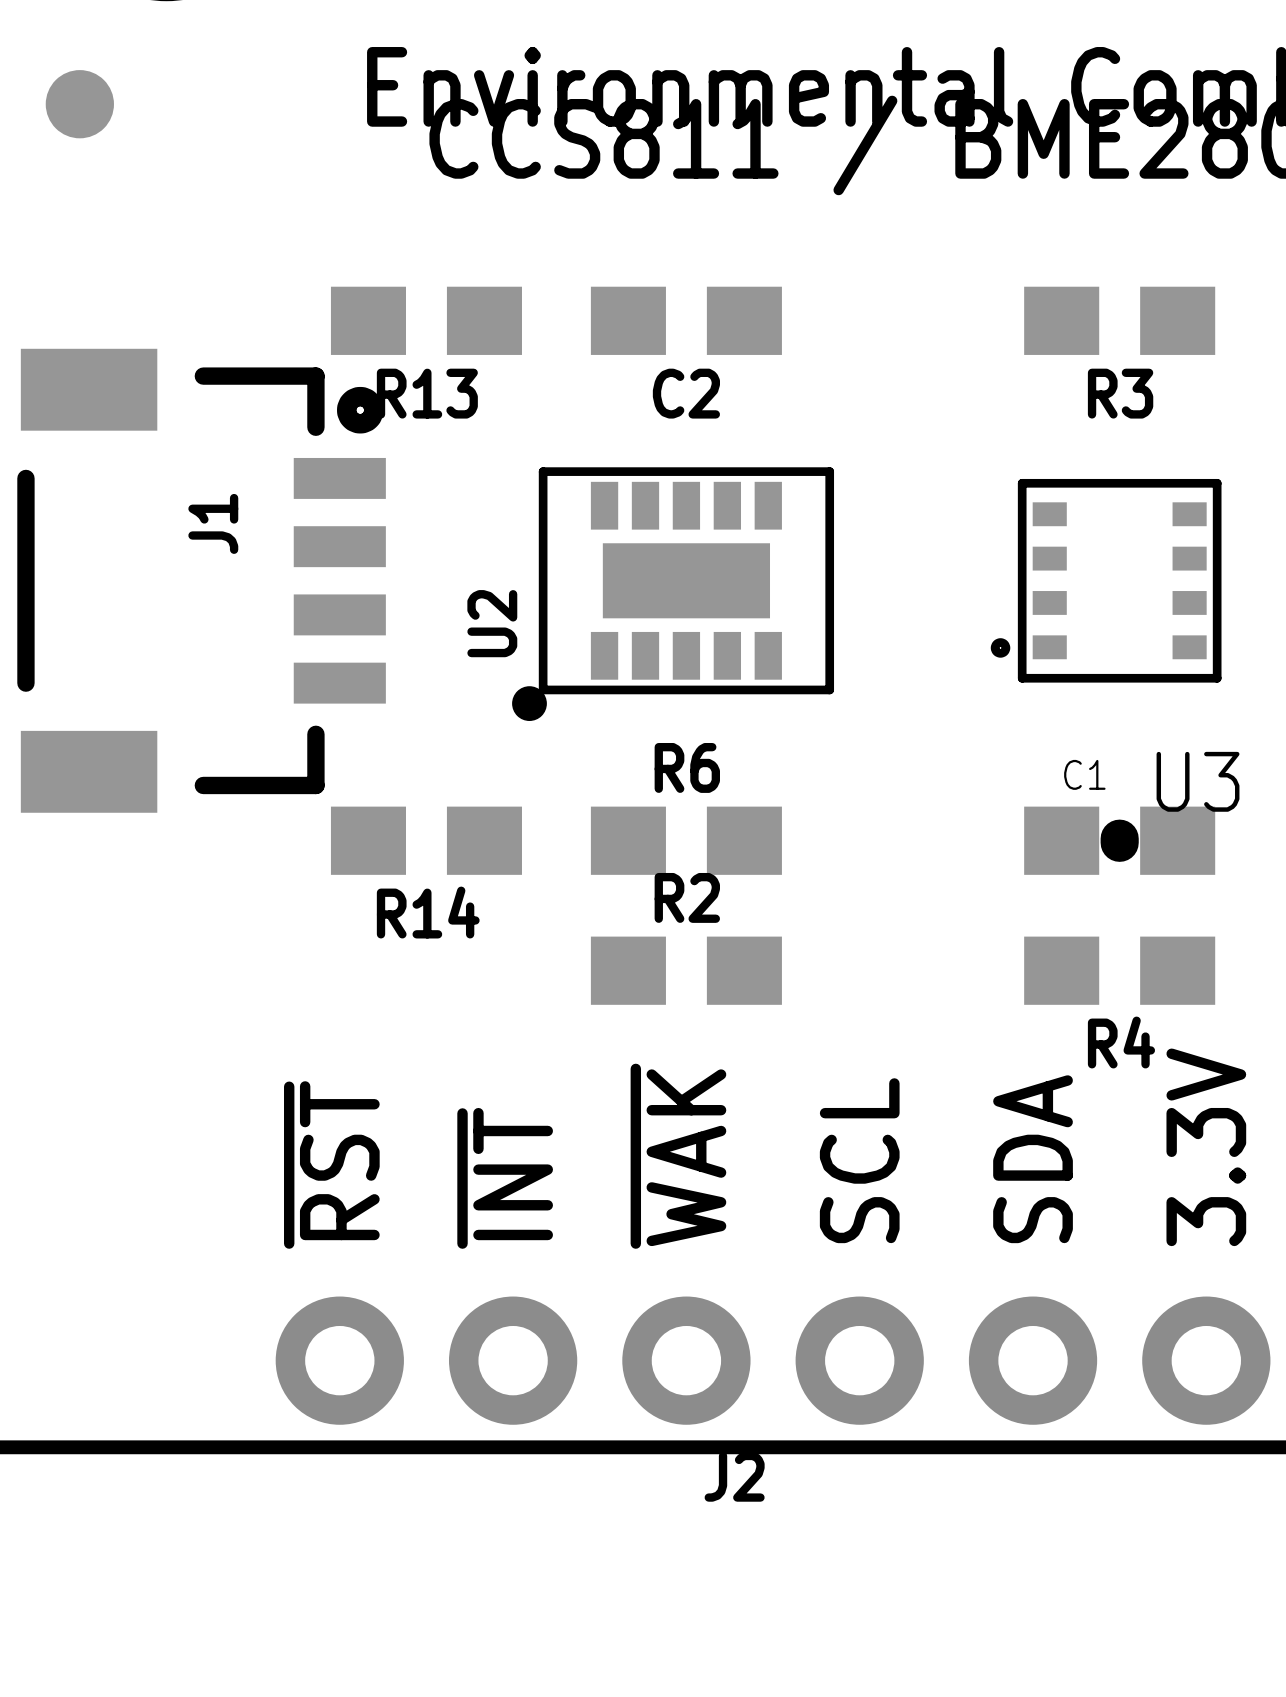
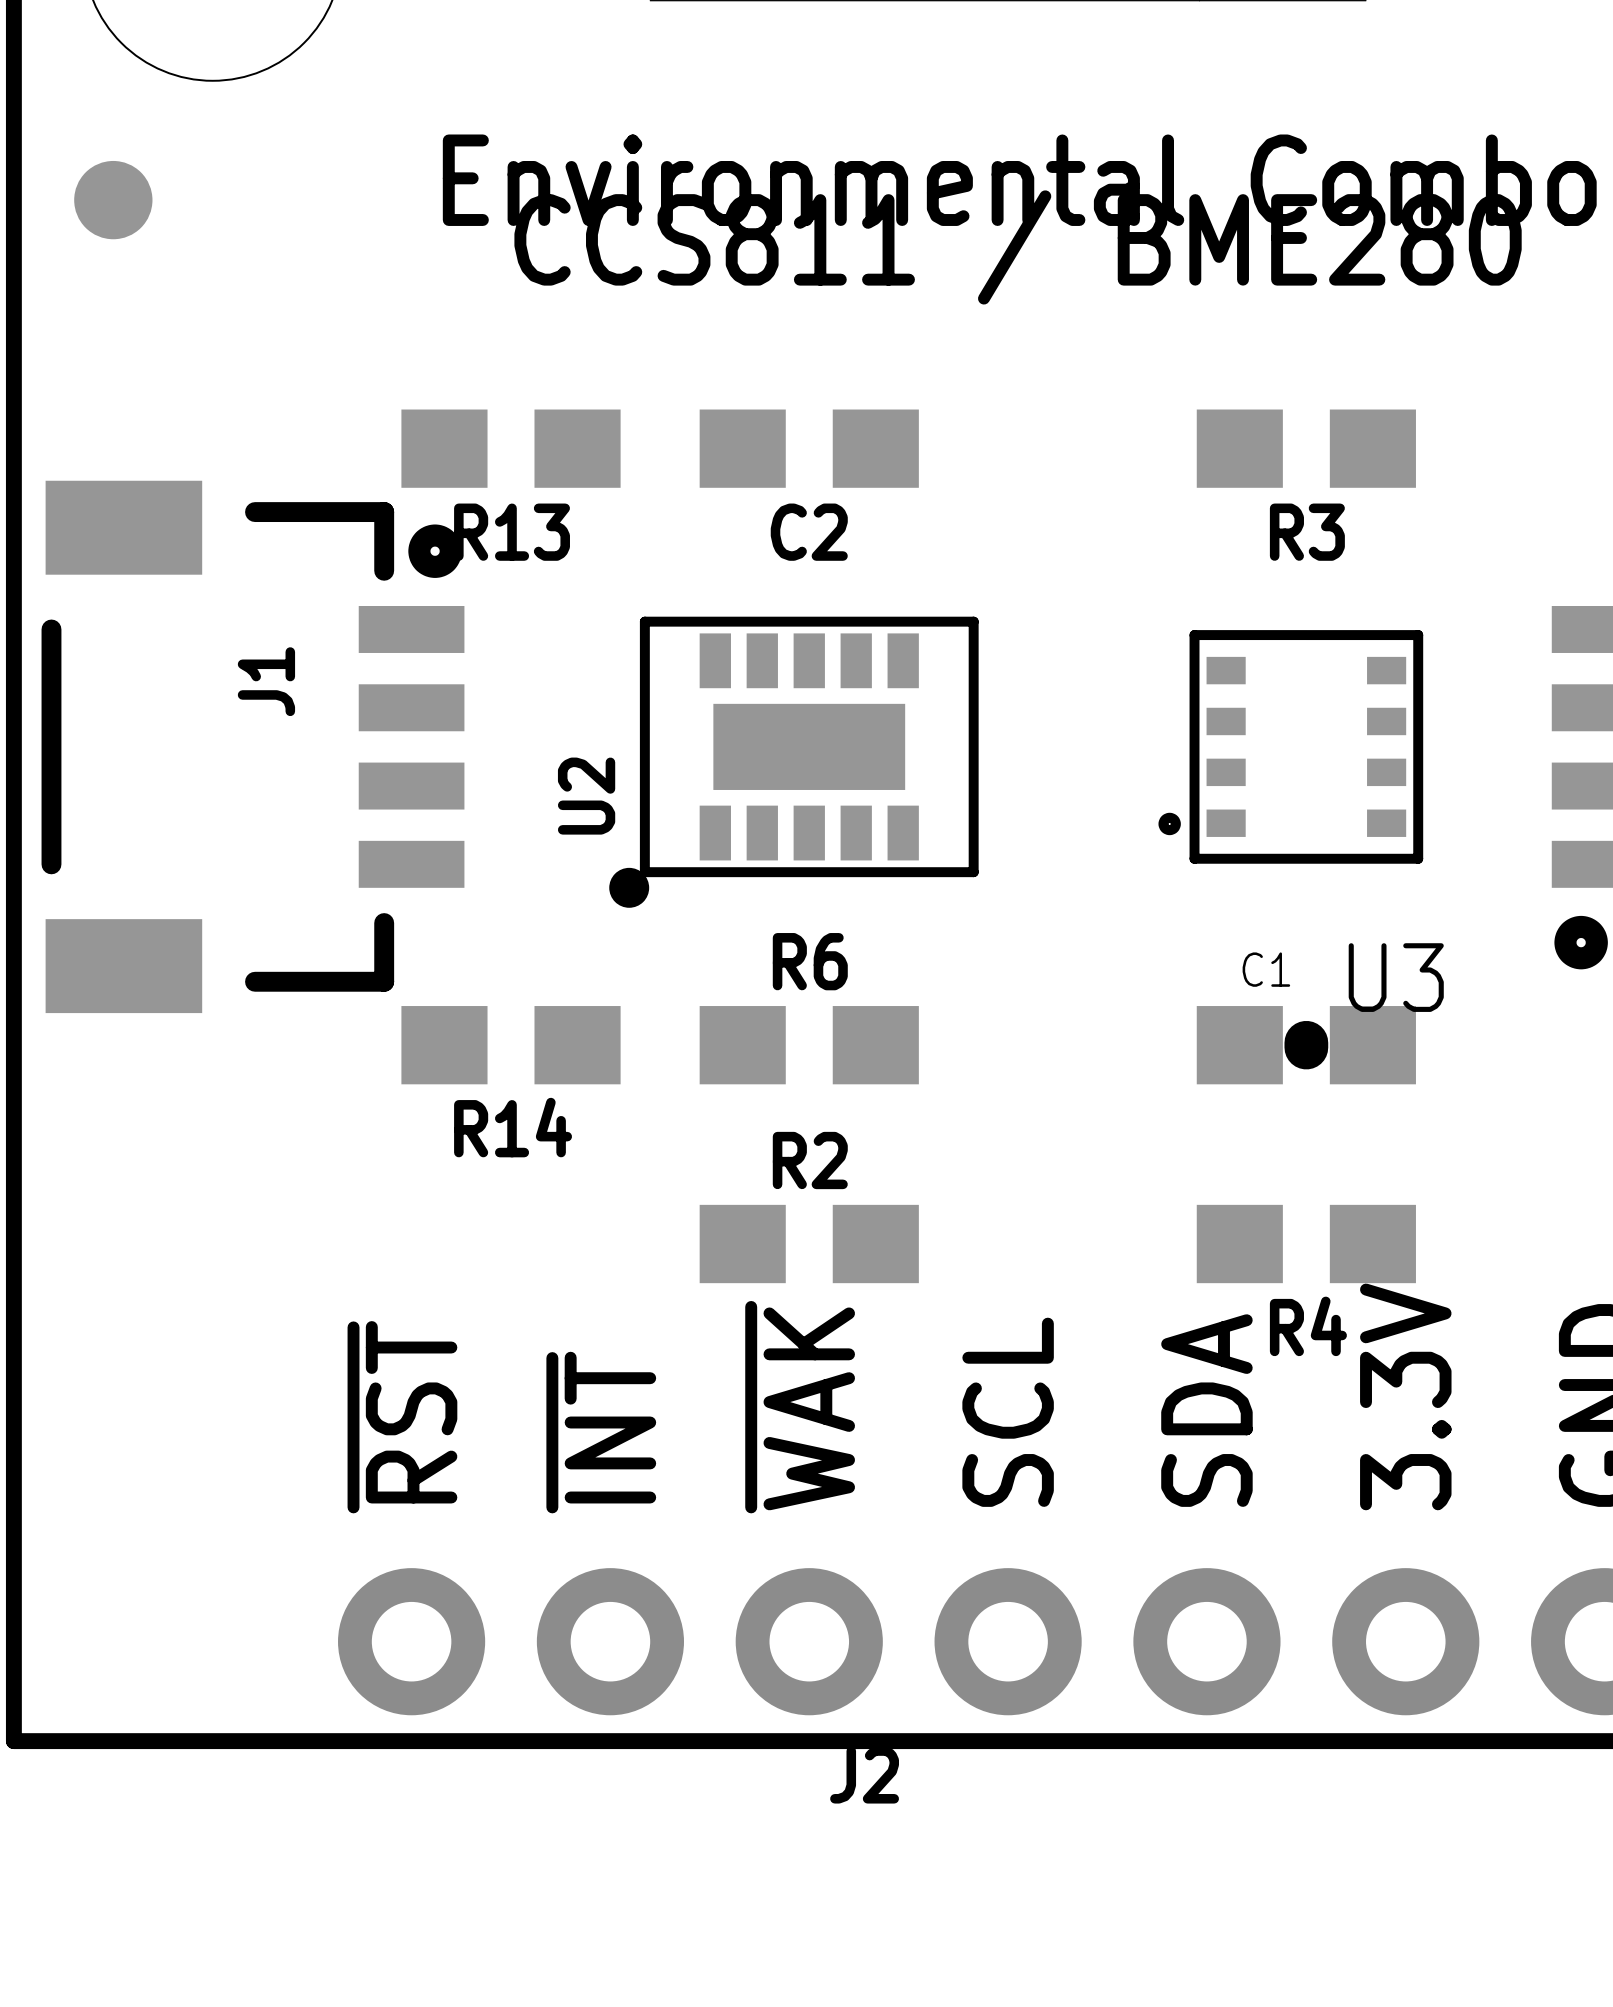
R2 position: (686, 970) -> (809, 1244)
R4 position: (1119, 970) -> (1306, 1244)

